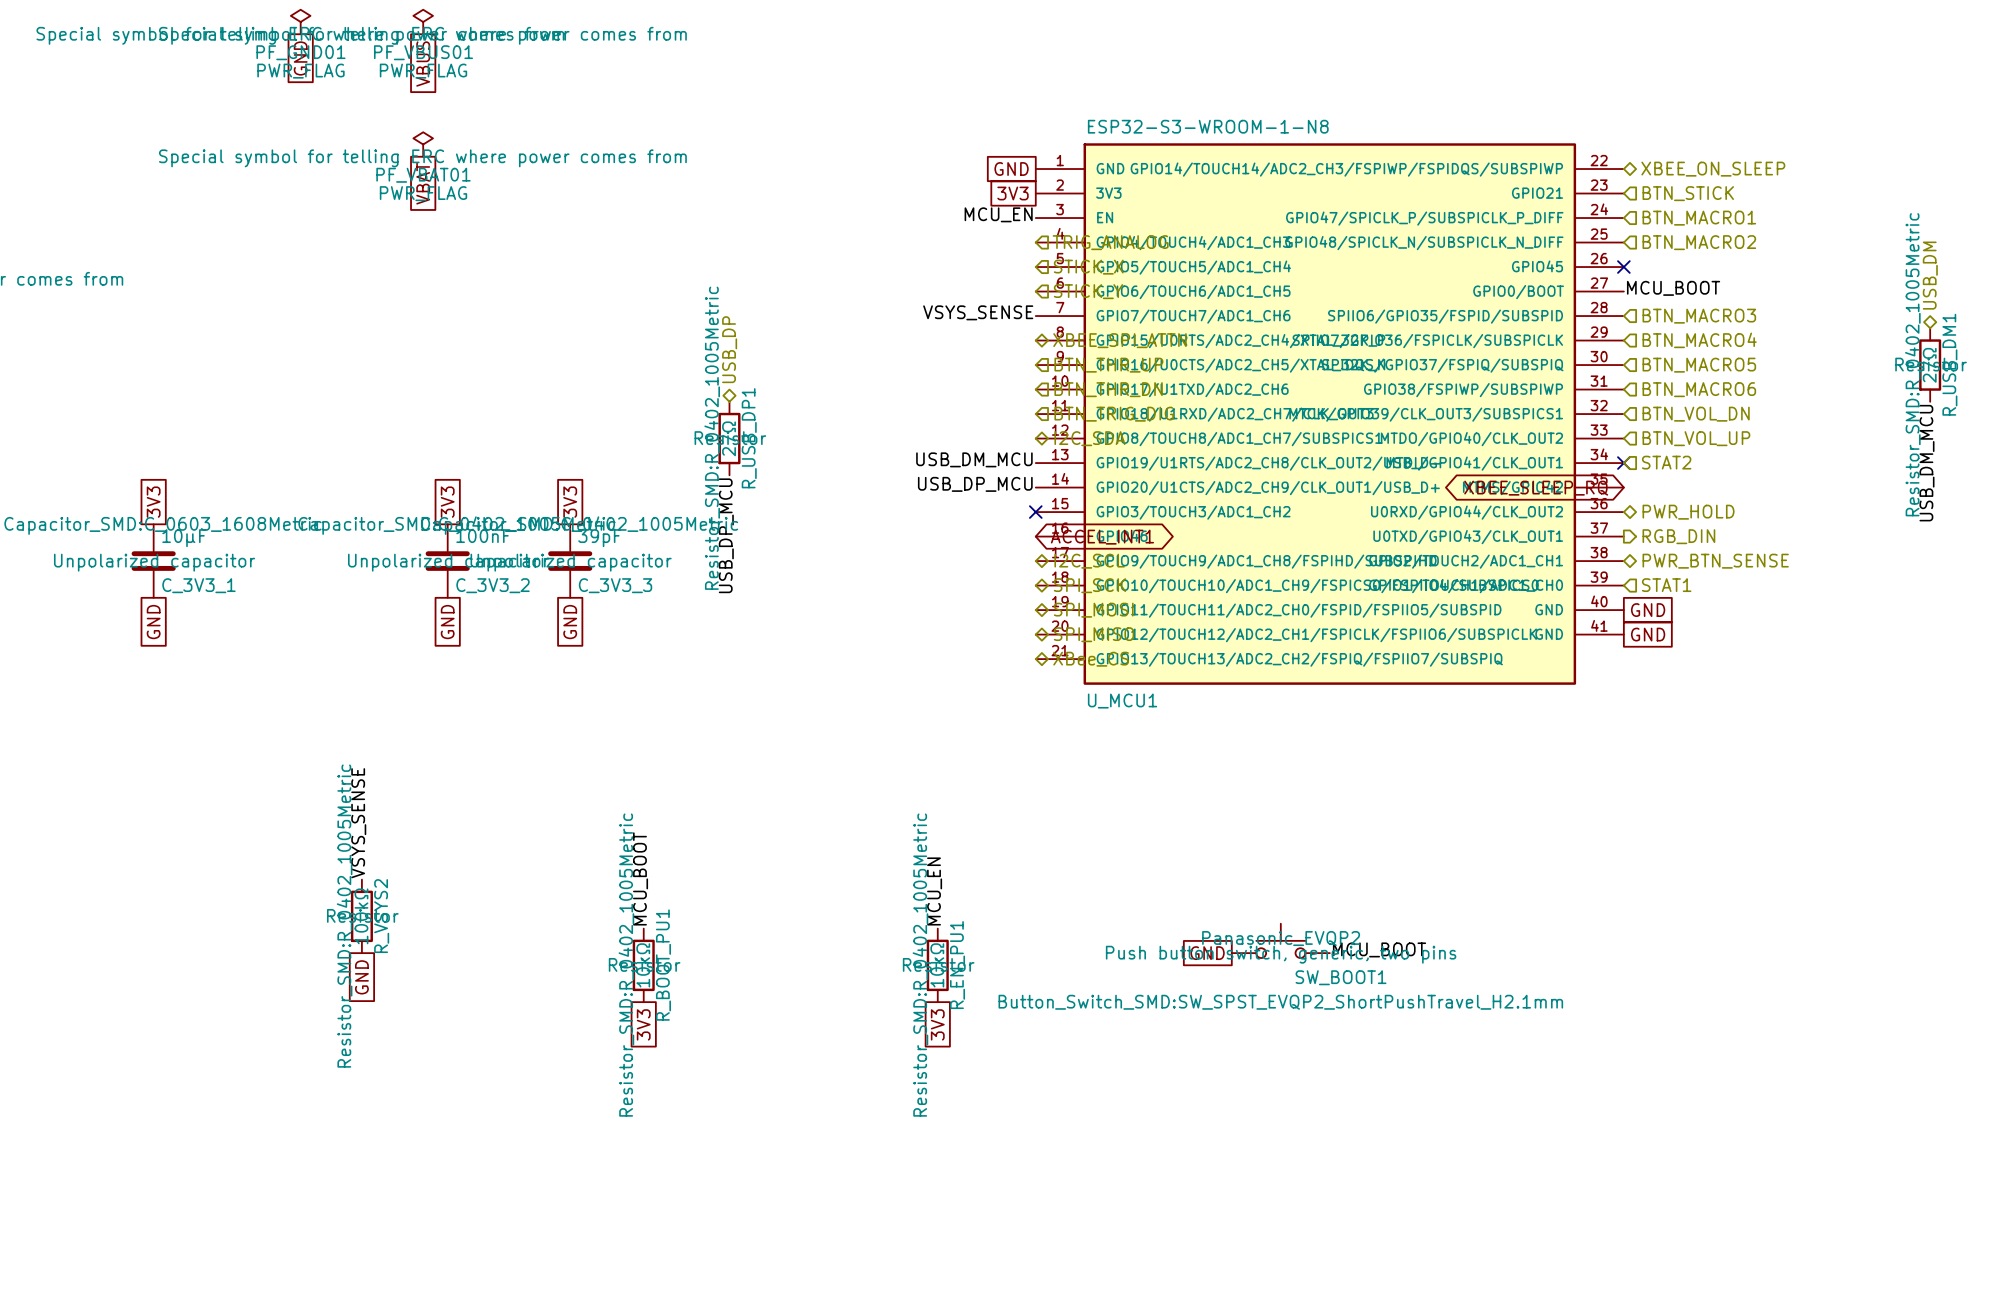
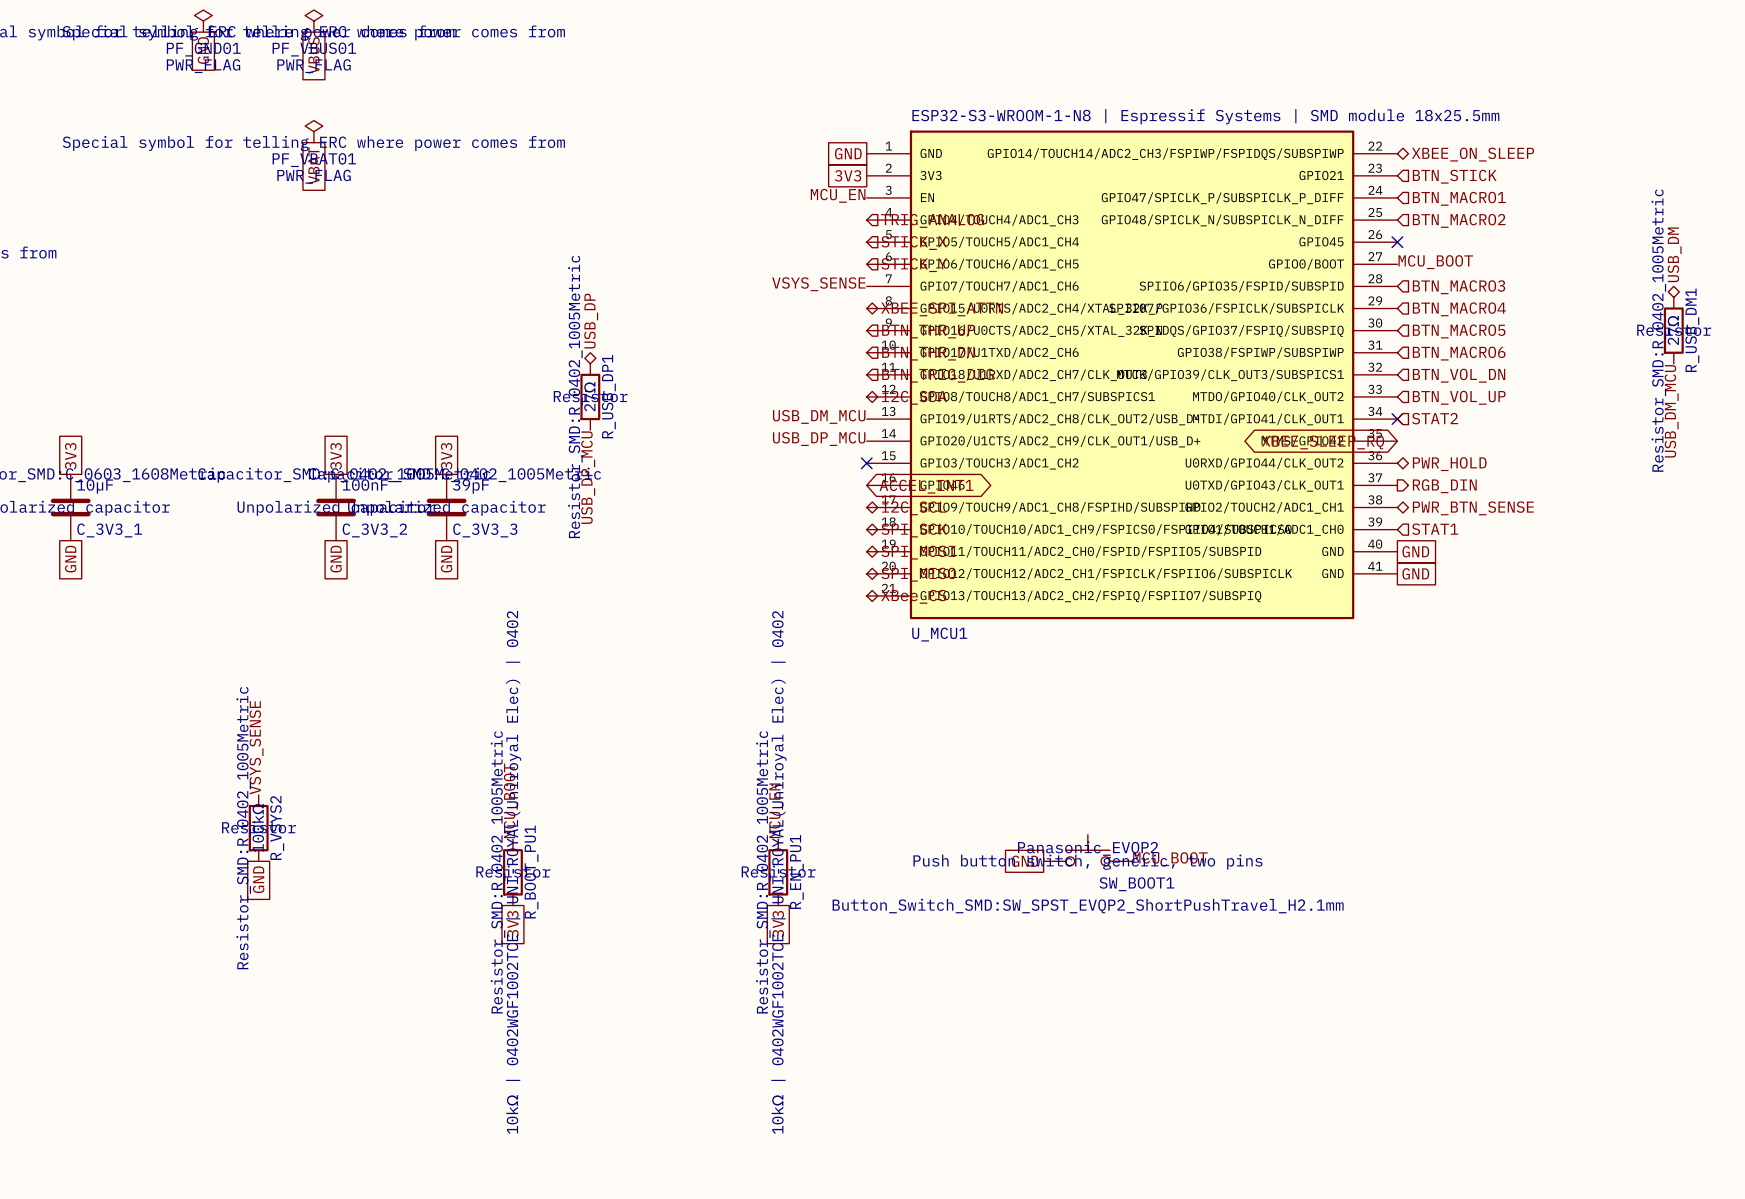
U_MCU1 value: ESP32-S3-WROOM-1-N8 (1208, 126) -> ESP32-S3-WROOM-1-N8 | Espressif Systems | SMD module 18x25.5mm (1205, 116)
R_BOOT_PU1 value: 10kΩ (643, 965) -> 10kΩ | 0402WGF1002TCE | UNI-ROYAL(Uniroyal Elec) | 0402 (513, 872)
R_EN_PU1 value: 10kΩ (937, 965) -> 10kΩ | 0402WGF1002TCE | UNI-ROYAL(Uniroyal Elec) | 0402 (778, 872)

